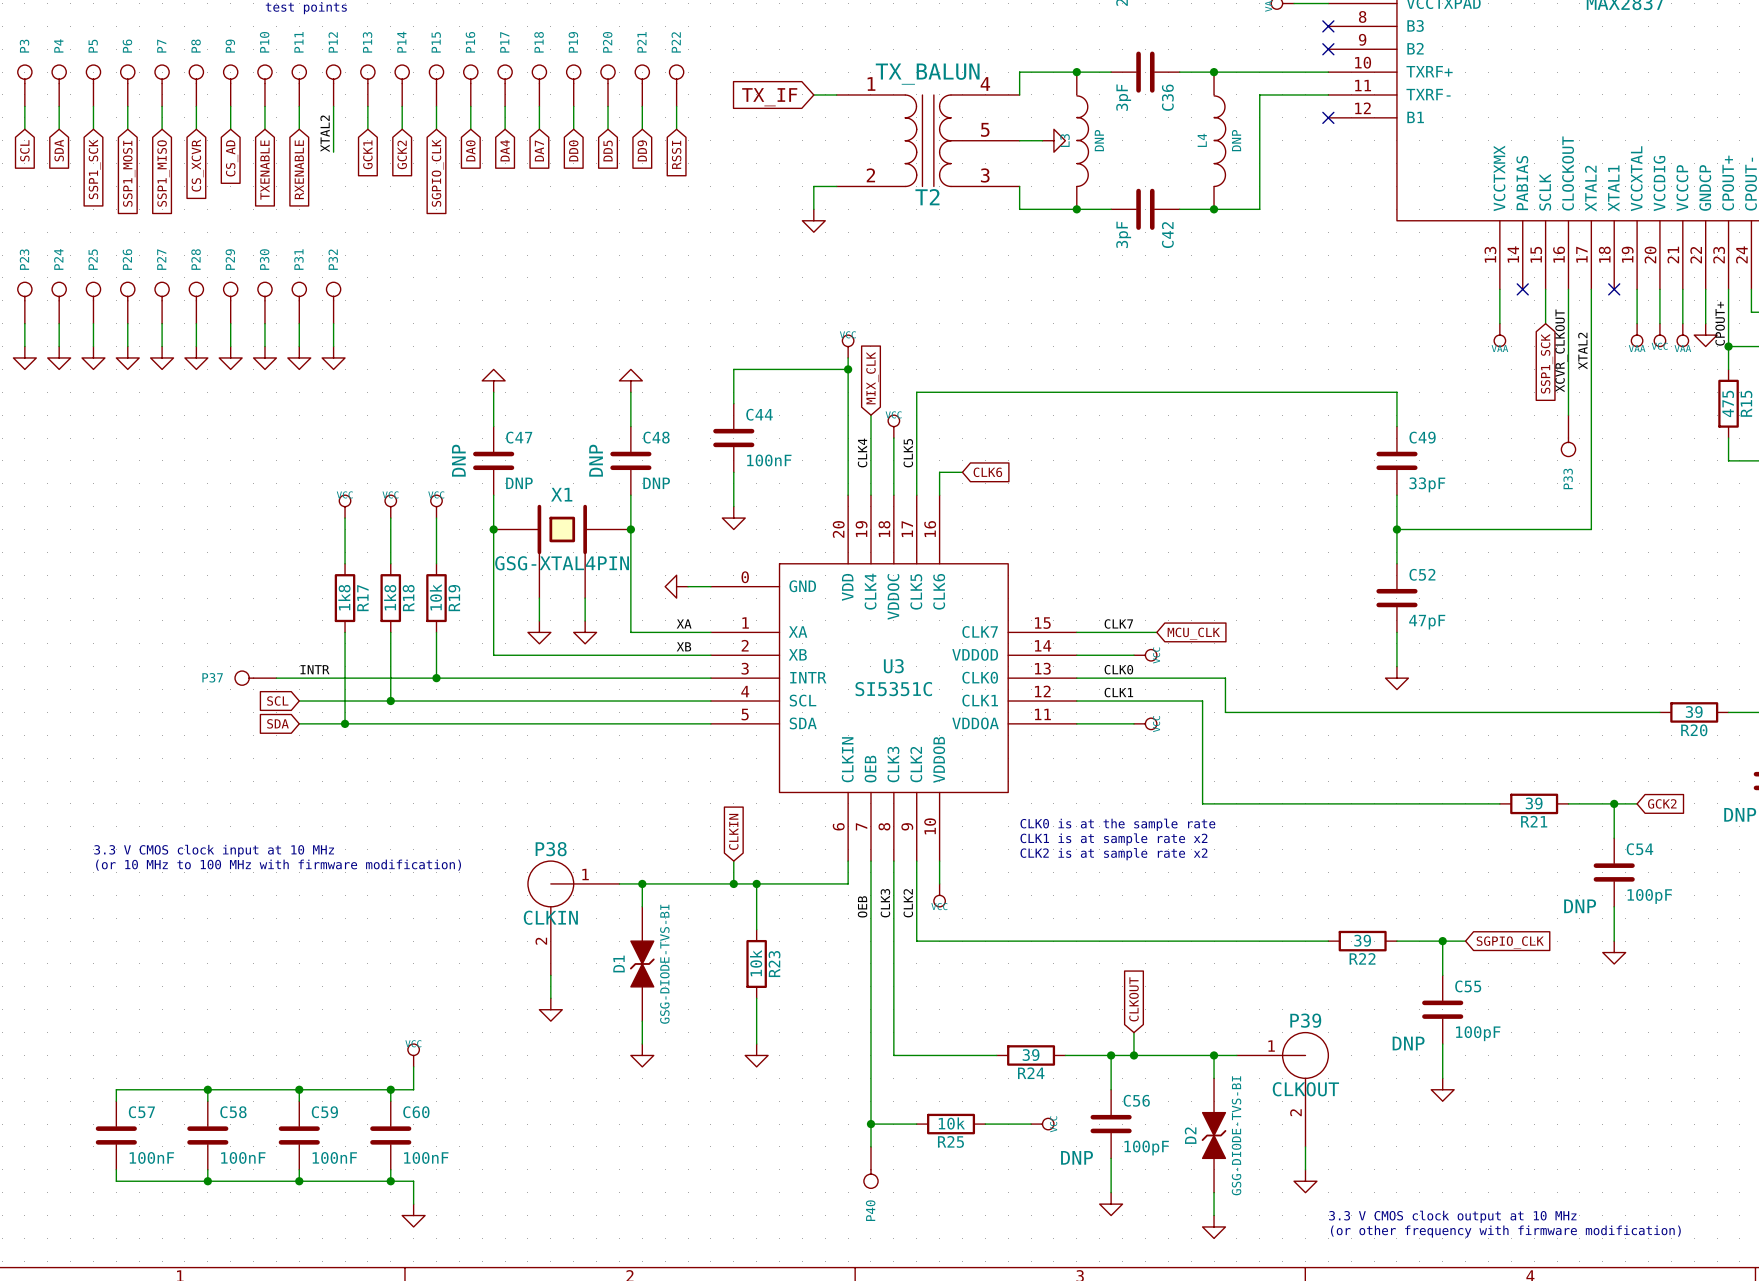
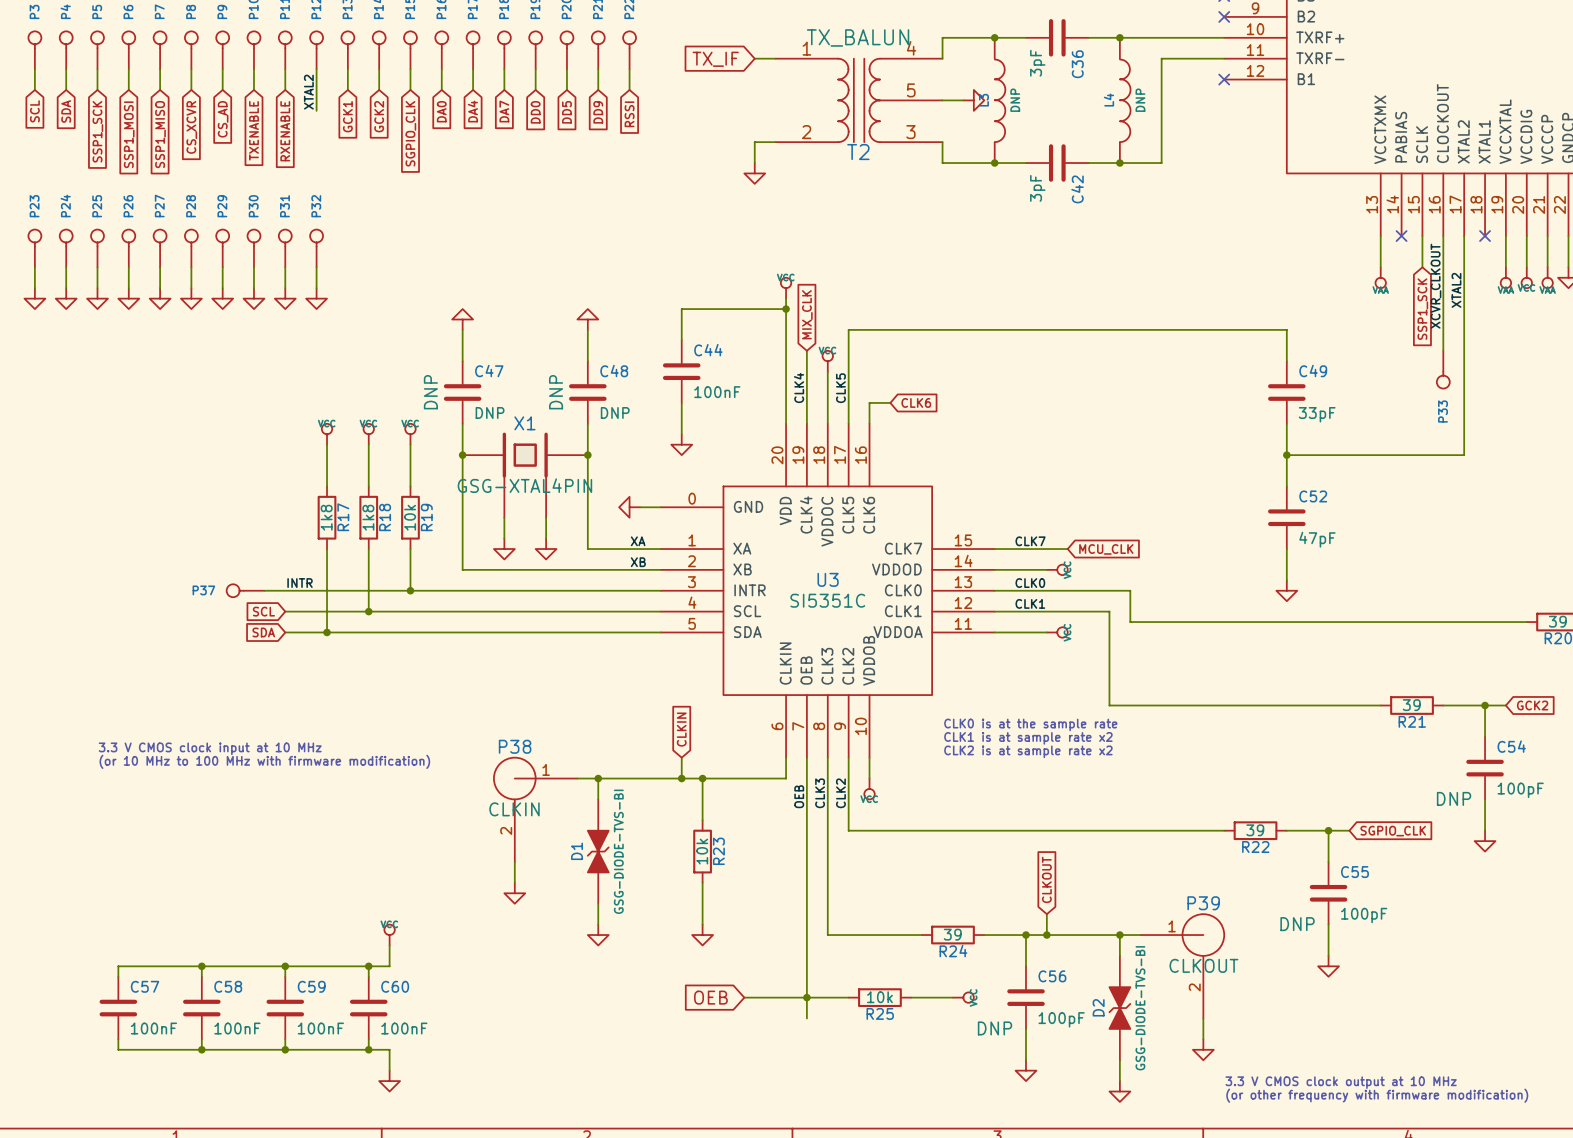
global label: none -> OEB (710, 997)
wire: none -> (744, 997) (806, 997)
P40: (870, 1167) -> none

